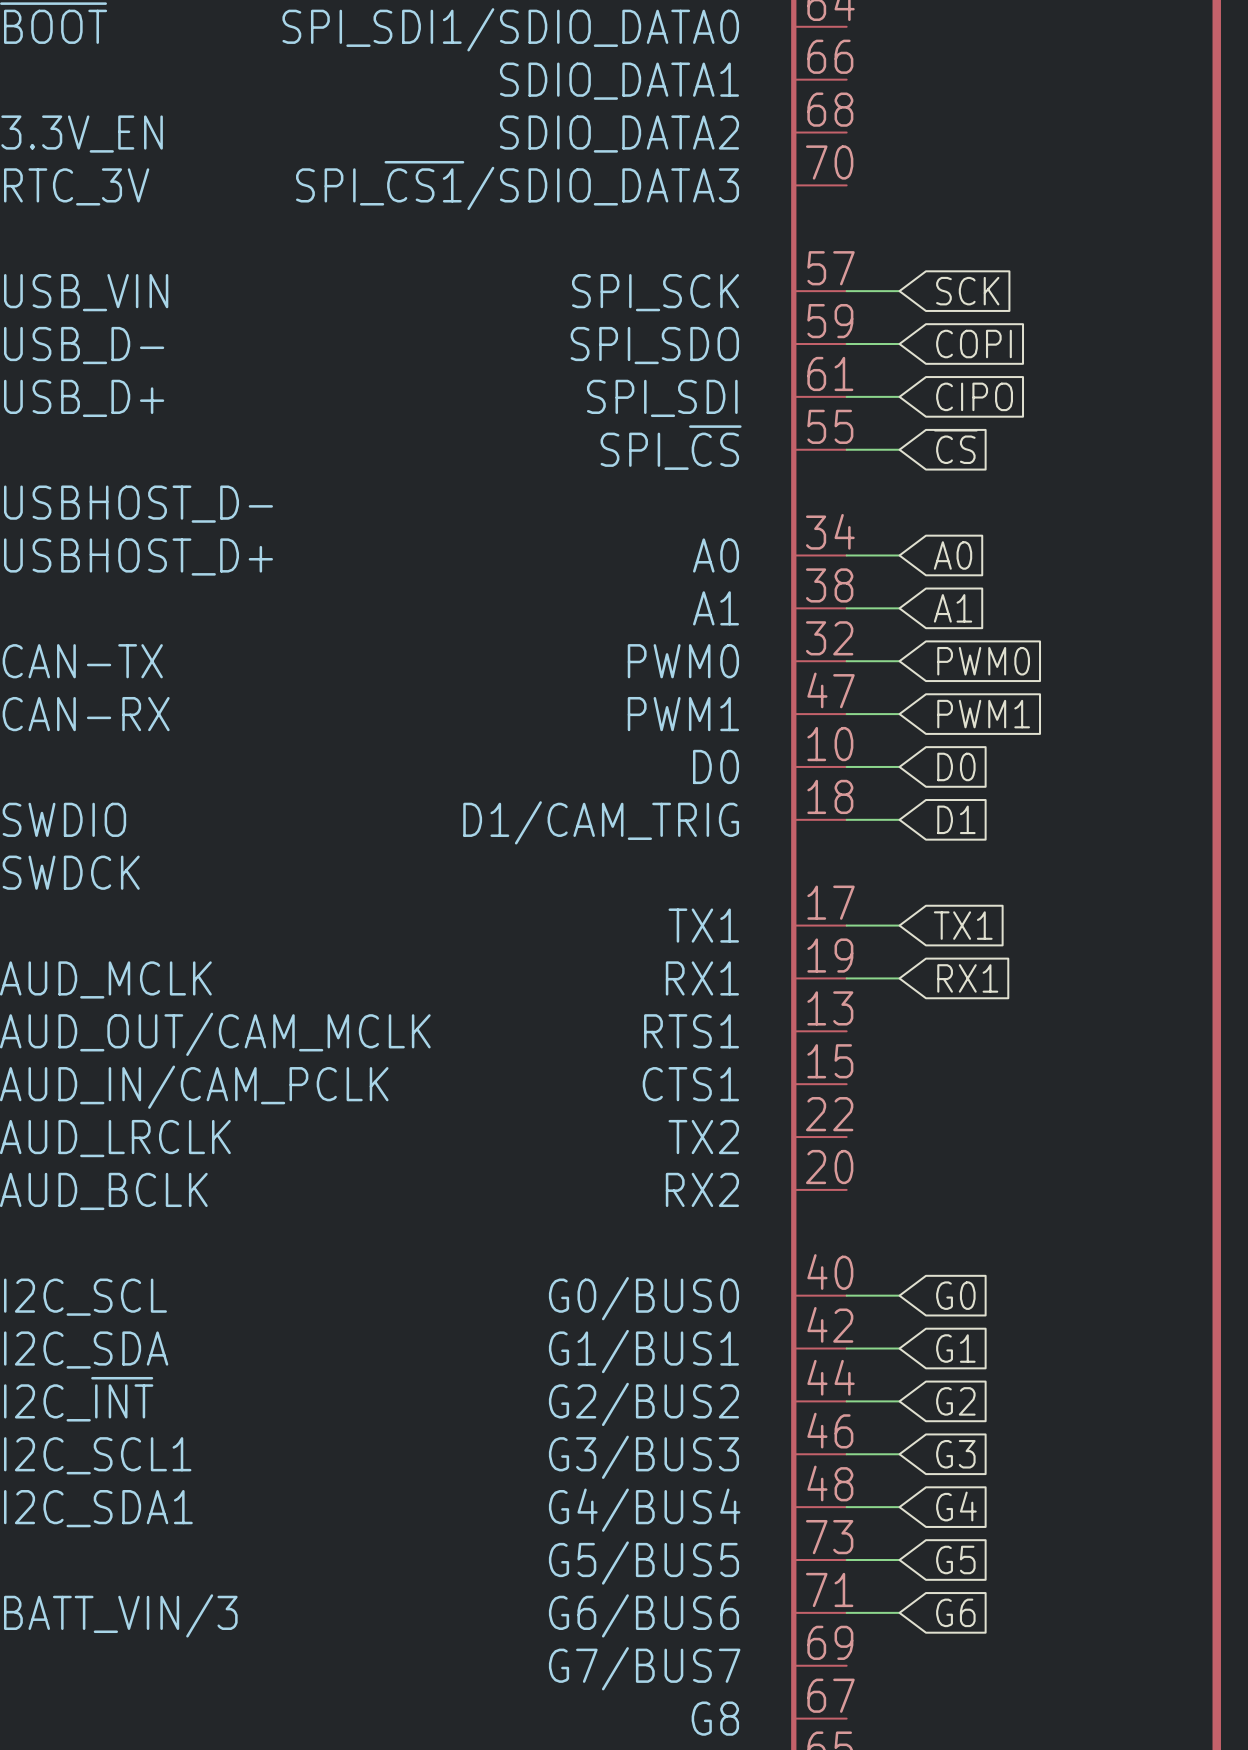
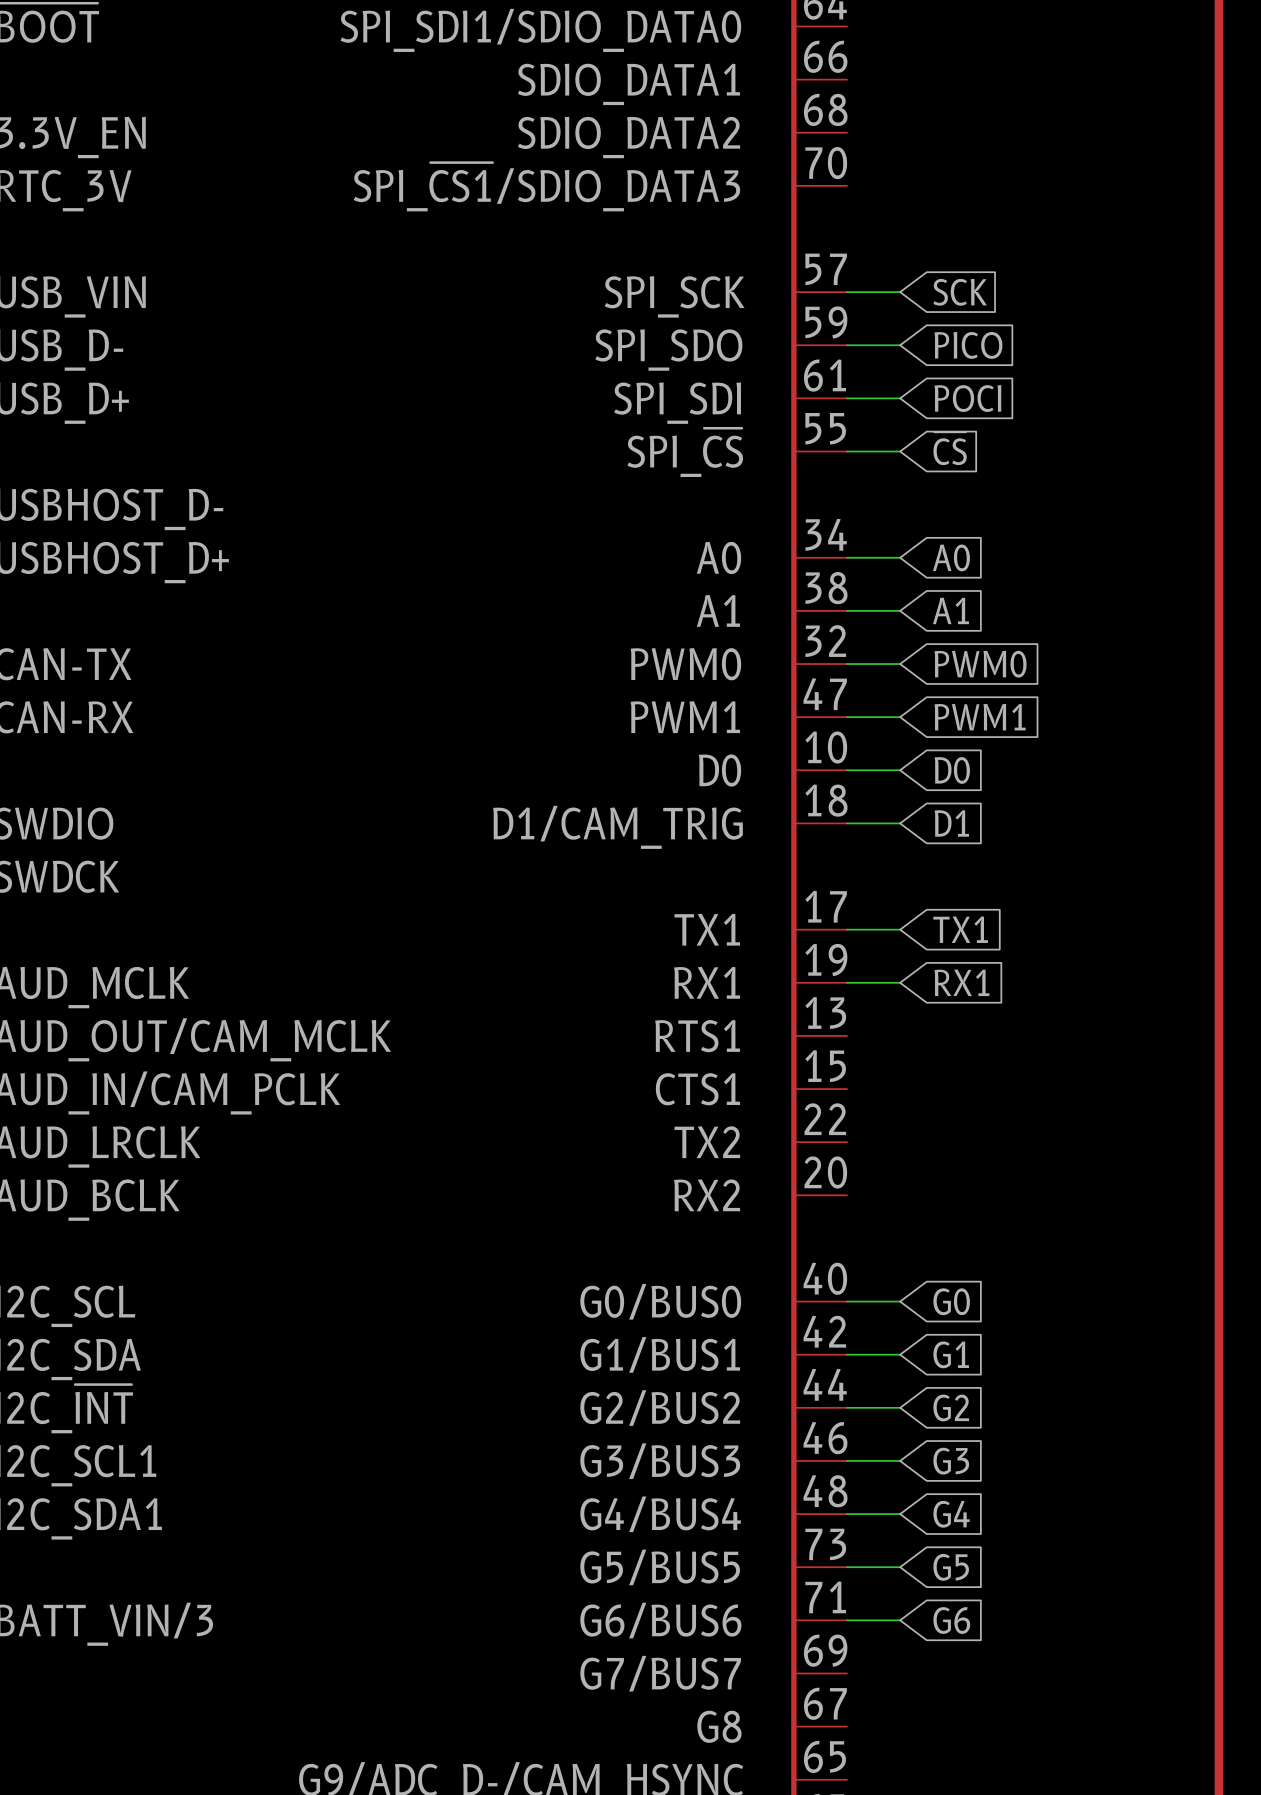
global label: COPI (973, 344) -> PICO (968, 345)
global label: CIPO (974, 396) -> POCI (967, 398)

